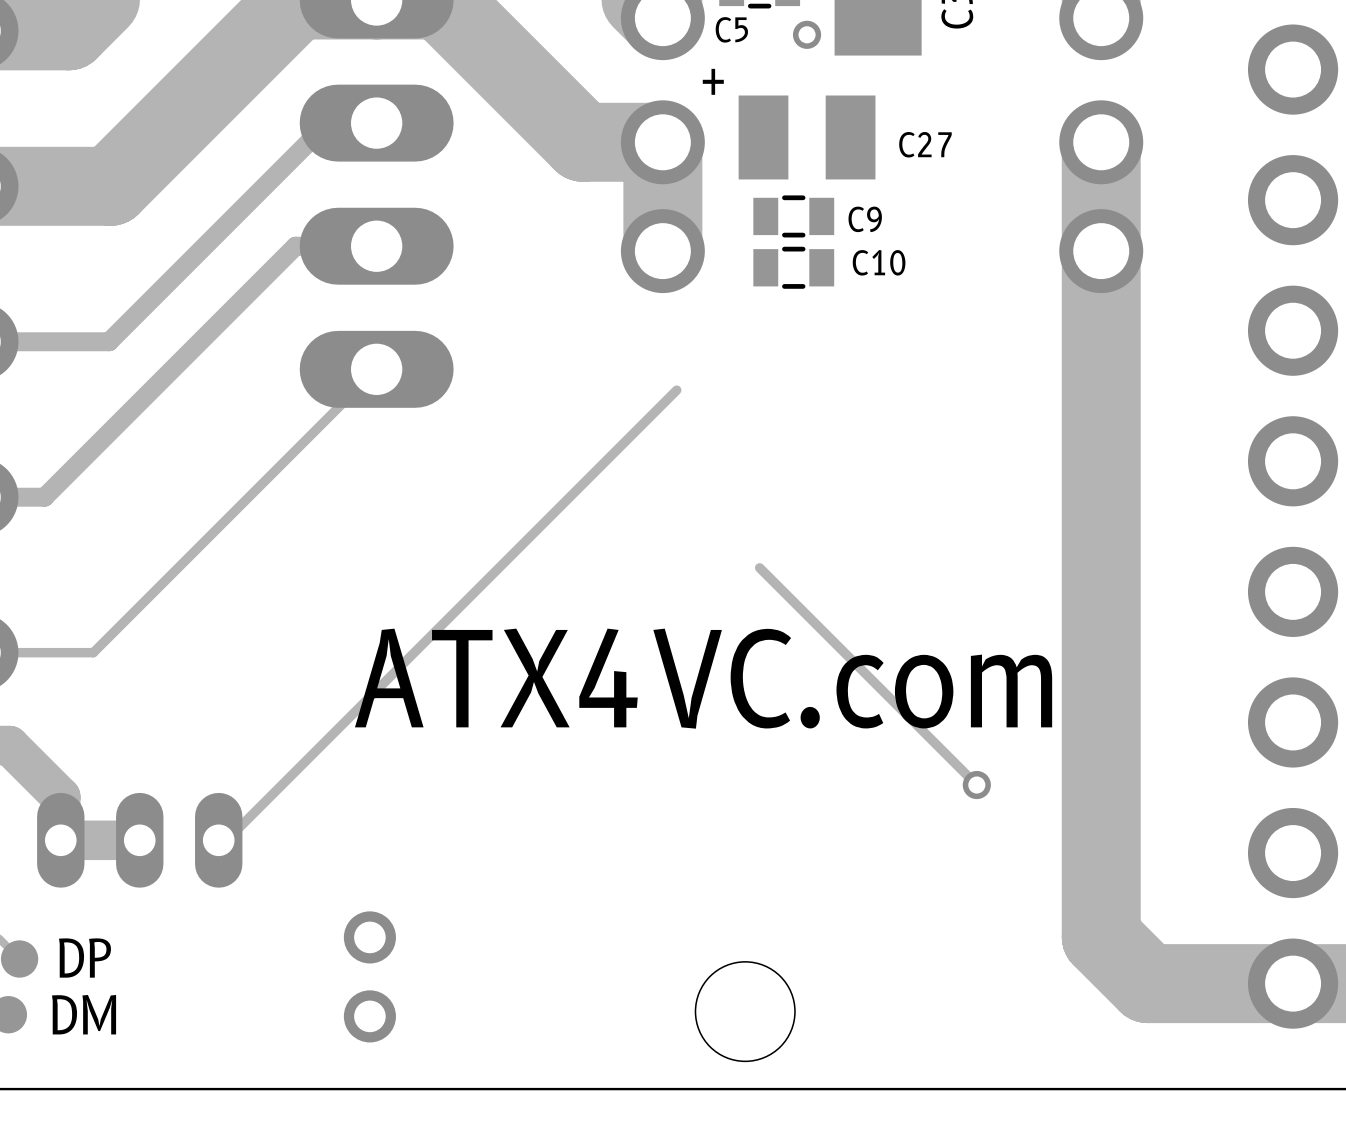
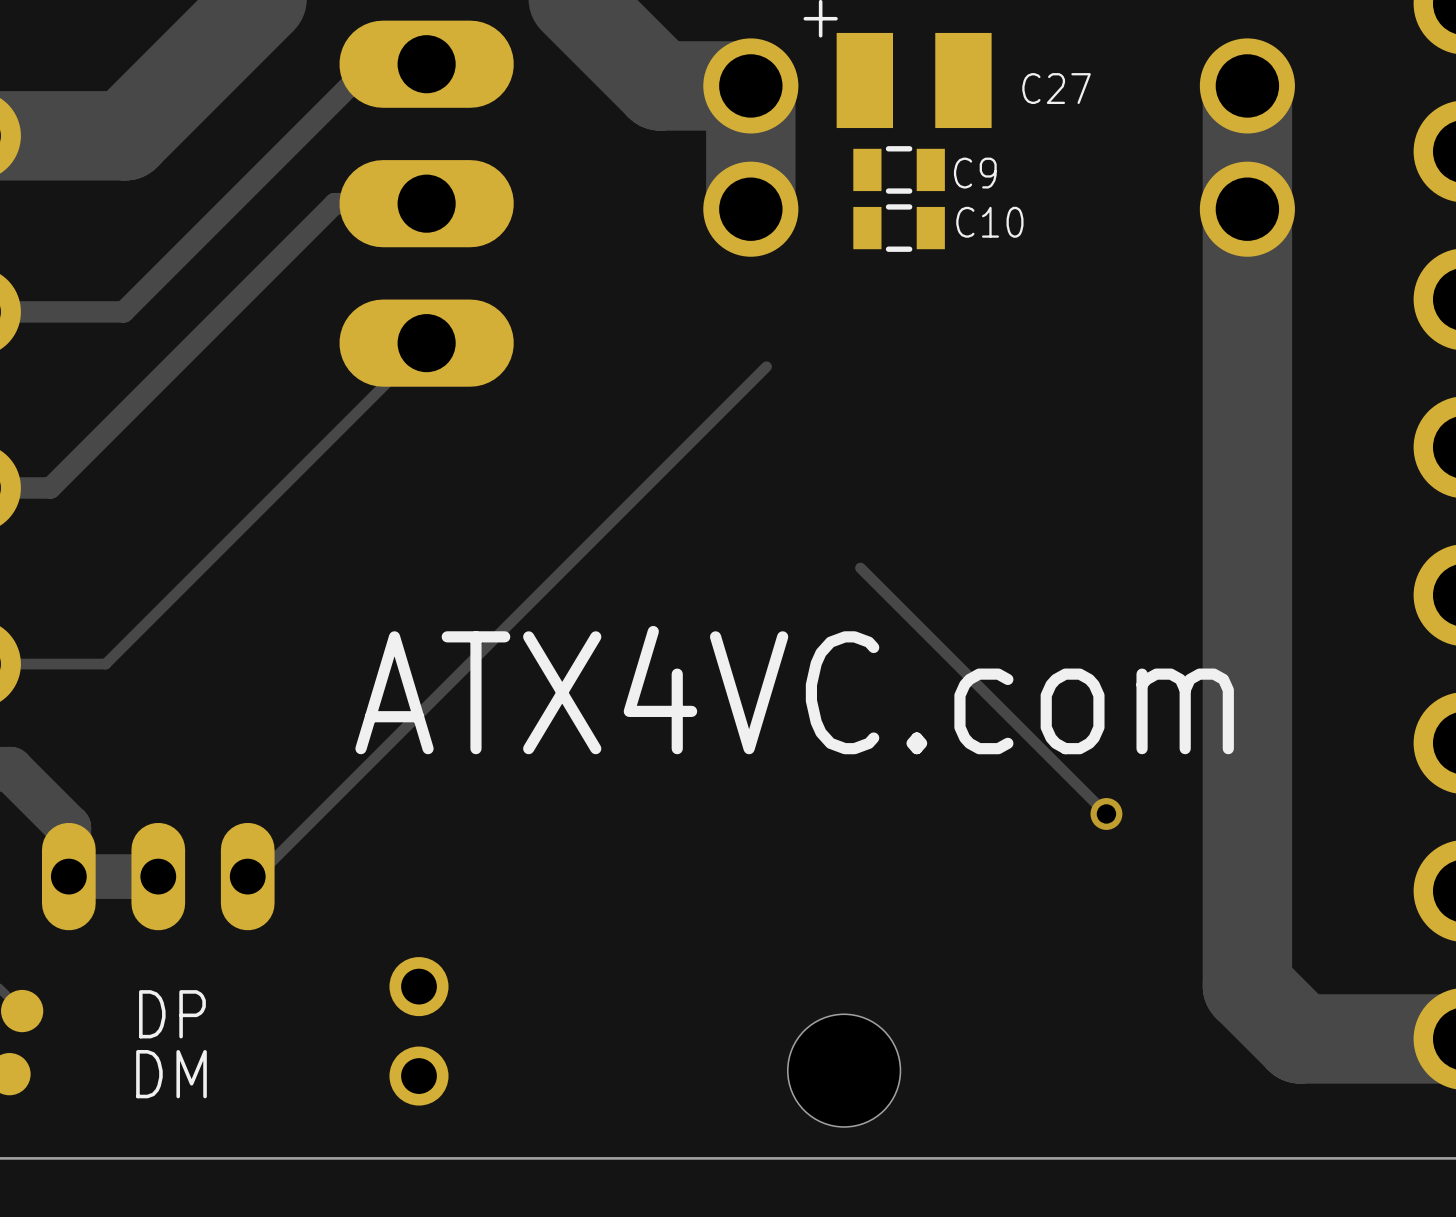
text position: DP (85, 958) -> DP (172, 1014)
text position: DM (84, 1014) -> DM (171, 1074)

